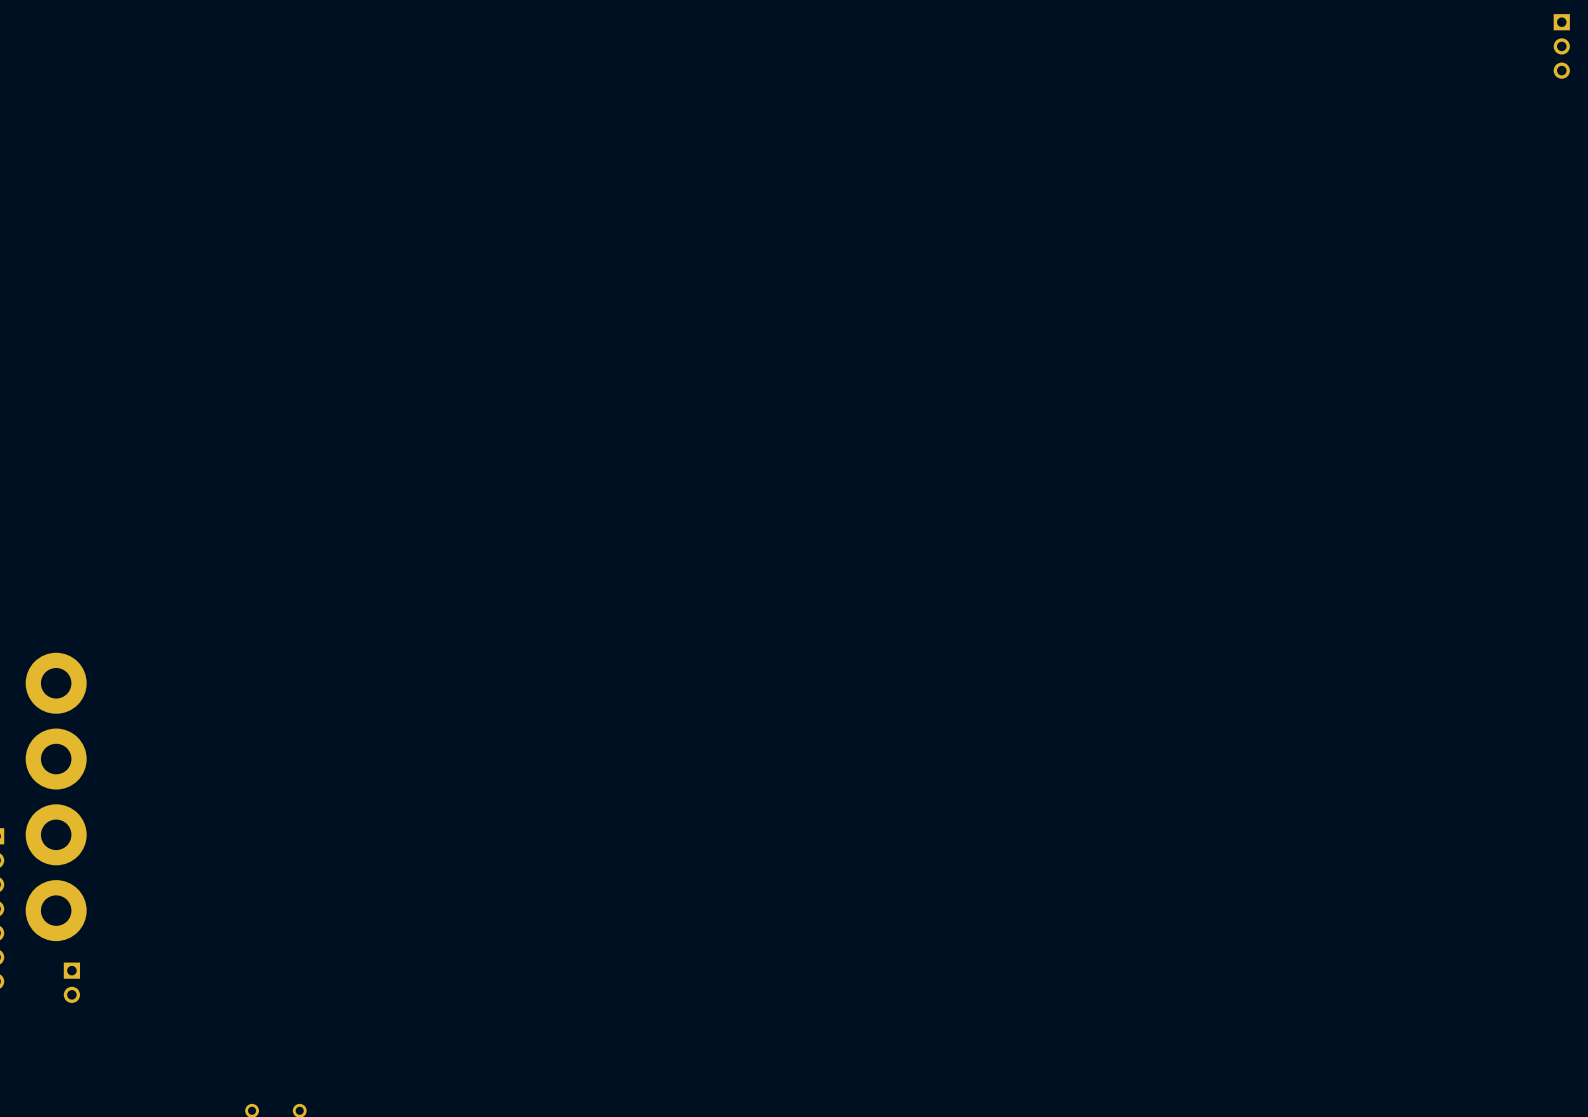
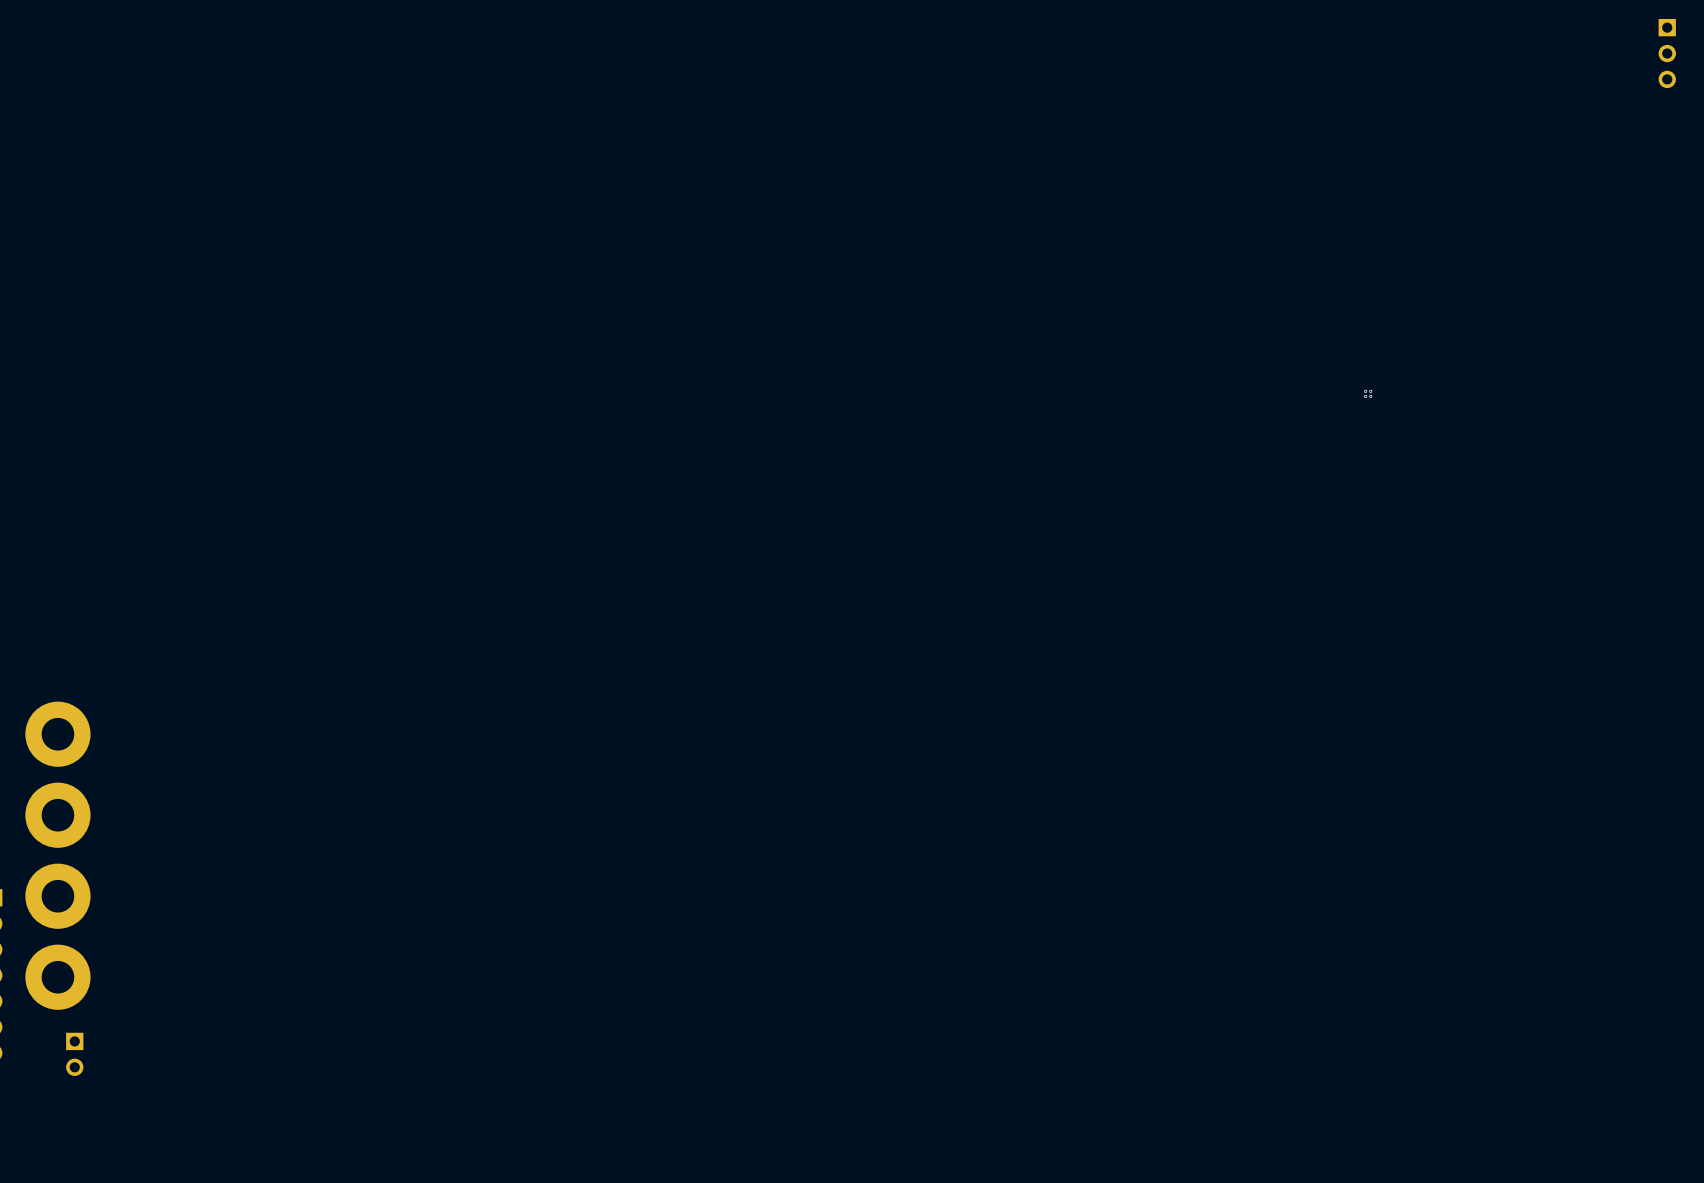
via: none -> (1365, 391)
via: none -> (1370, 391)
via: none -> (1365, 396)
via: none -> (1370, 396)

